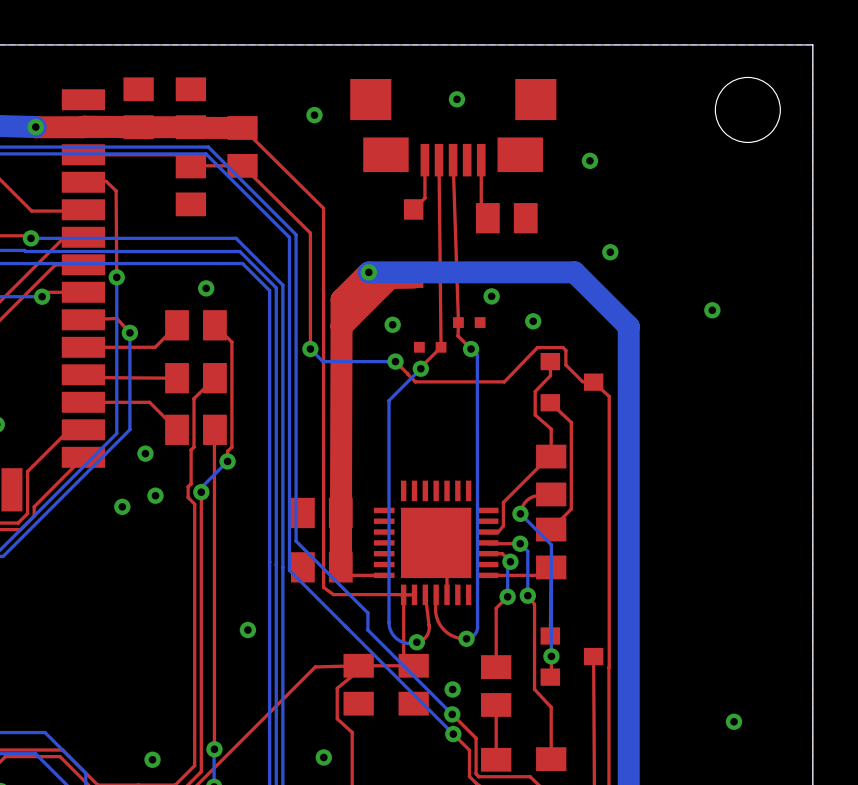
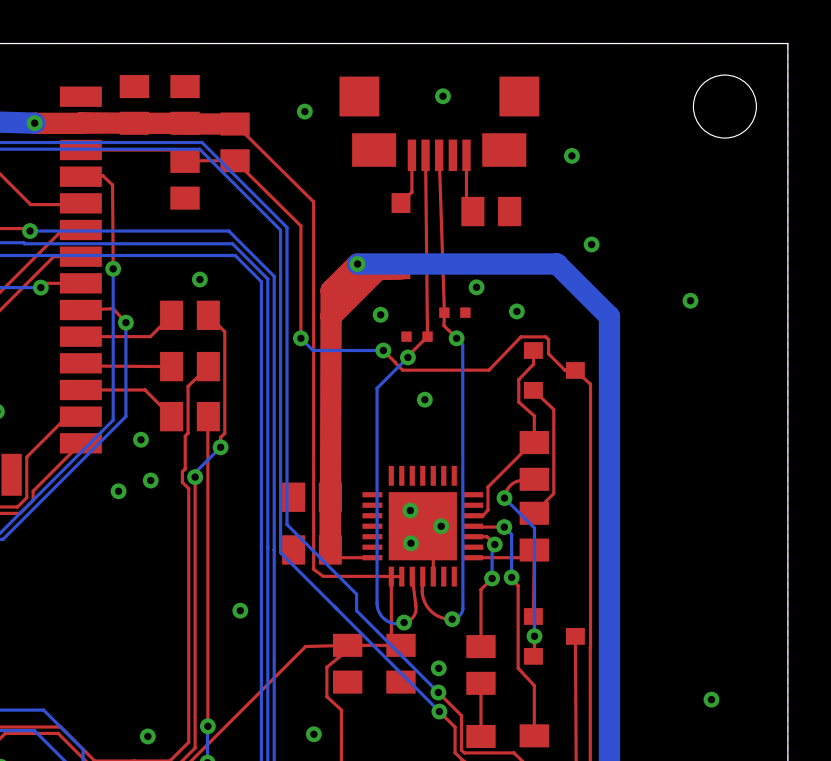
via: none -> (424, 399)
via: none -> (410, 510)
via: none -> (441, 526)
via: none -> (410, 543)

